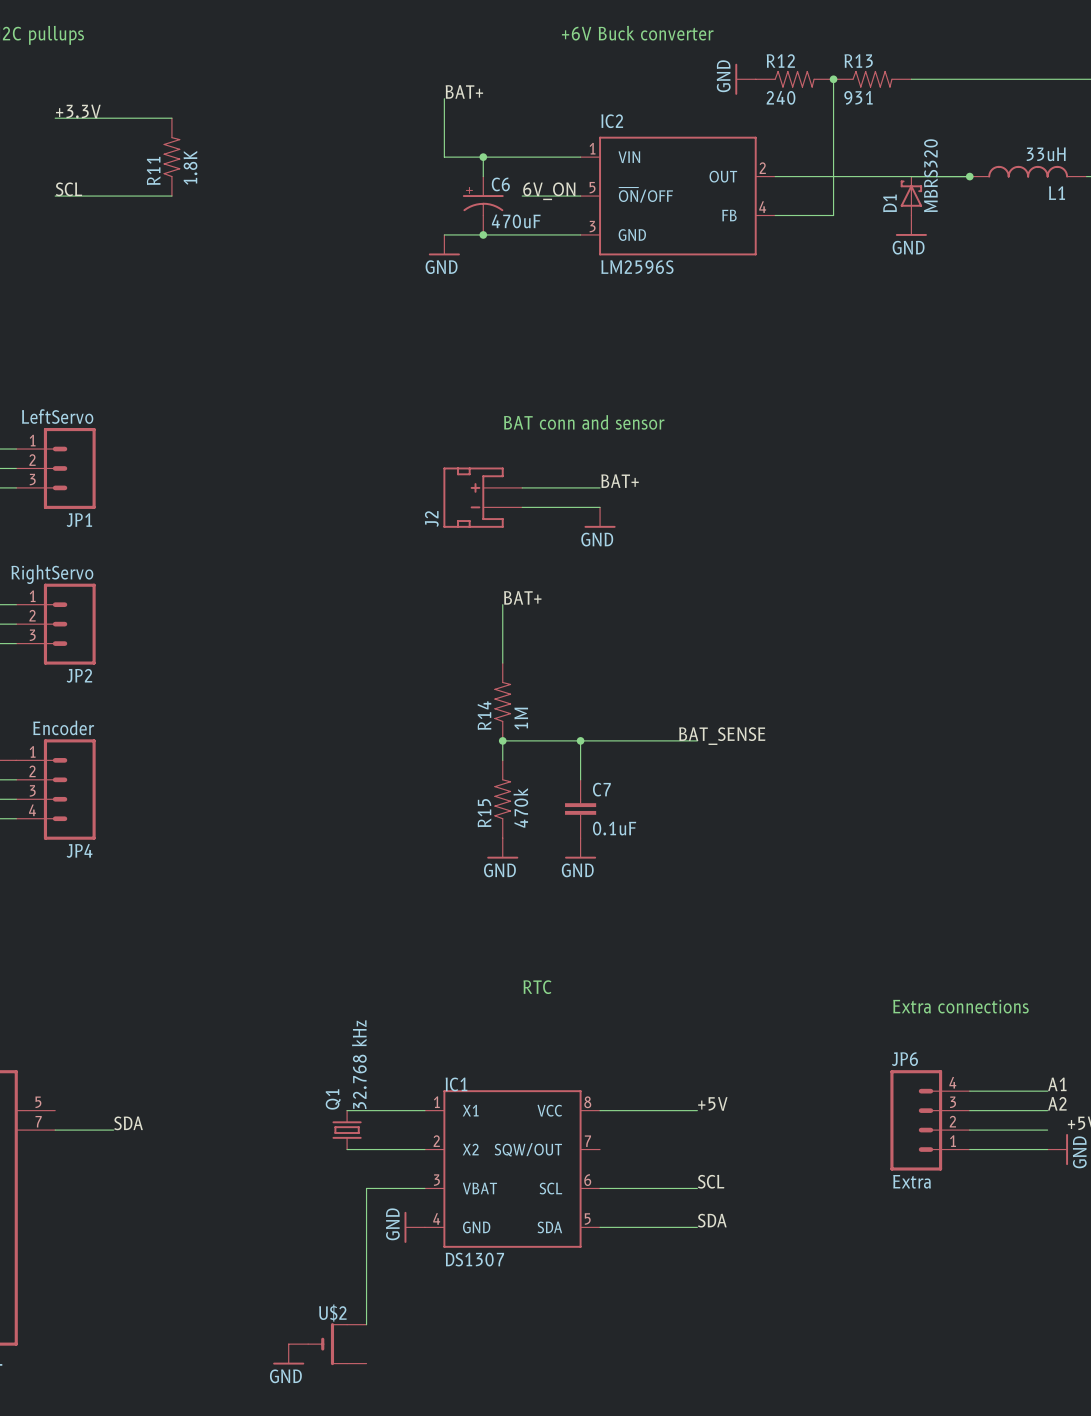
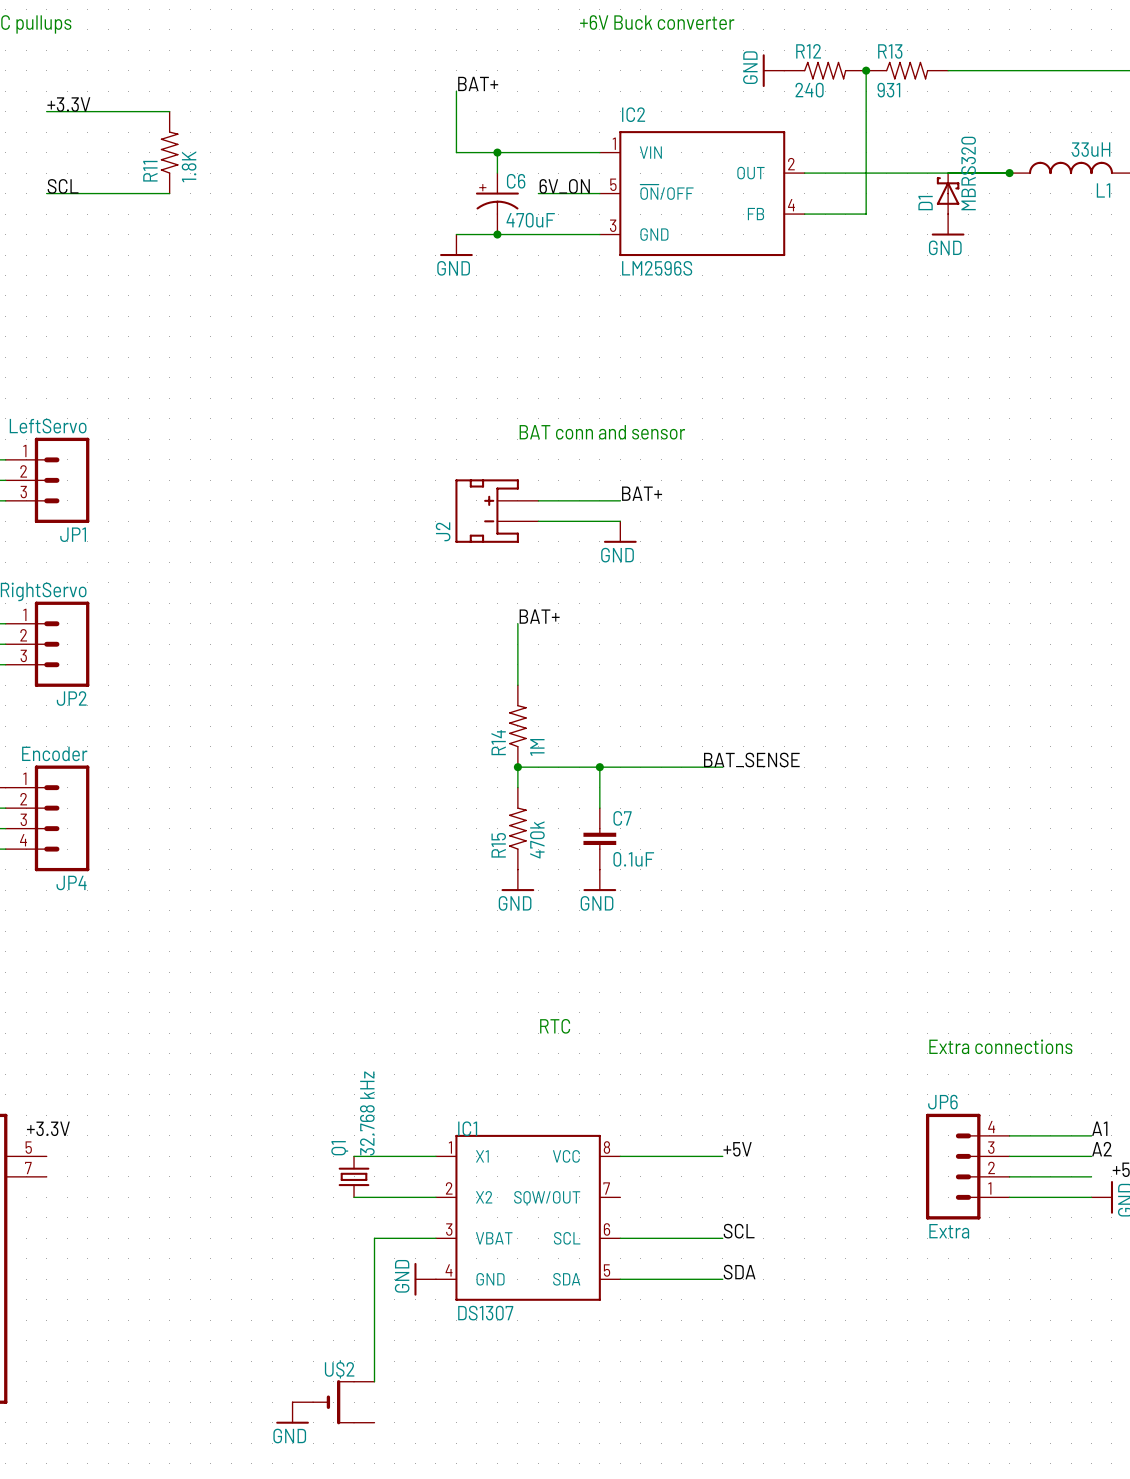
label: none -> +3.3V (48, 1128)
label: SDA (128, 1123) -> none
wire: (55, 1130) (113, 1130) -> none

